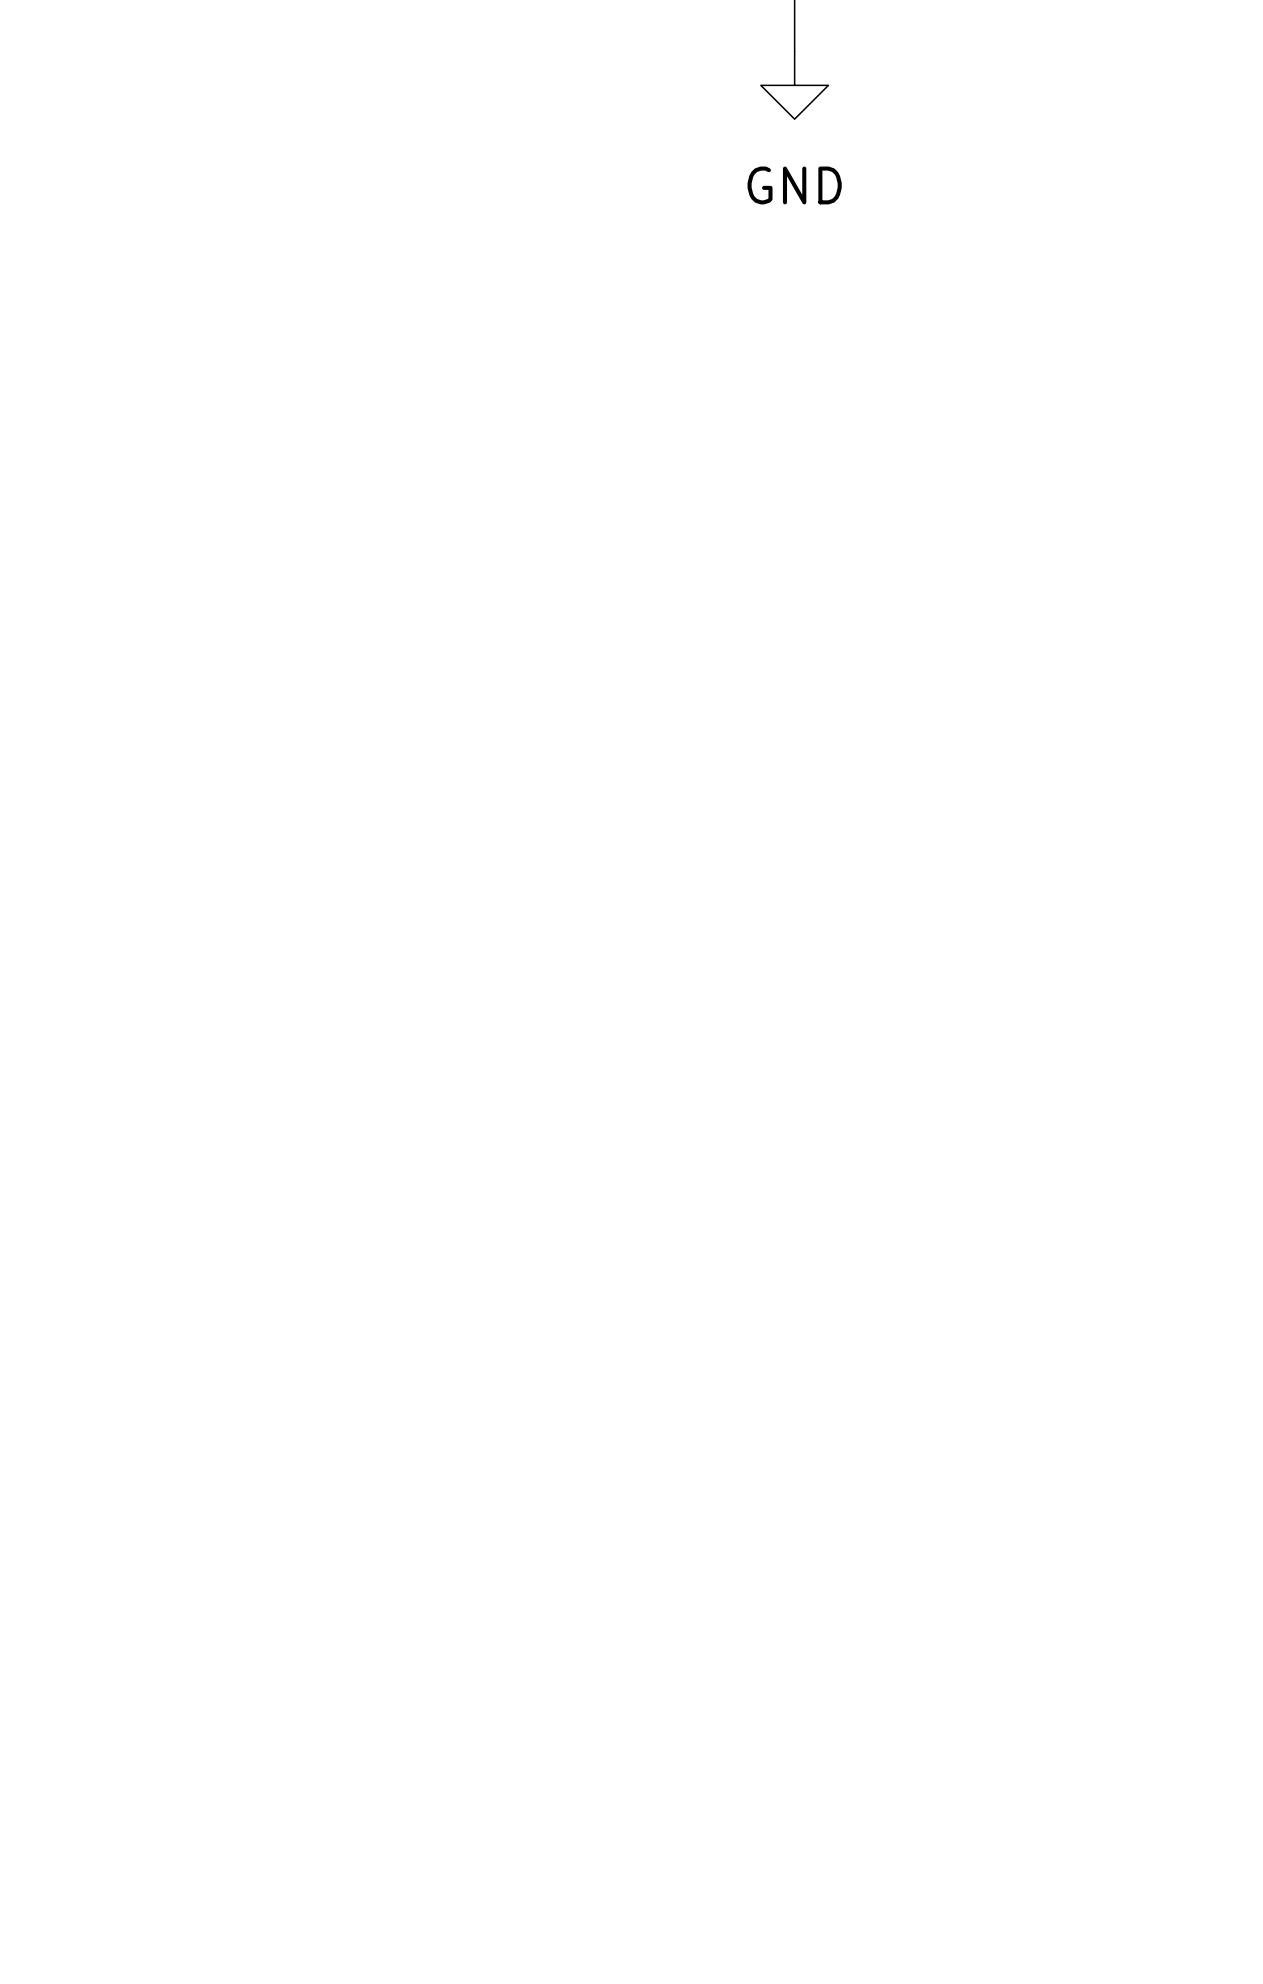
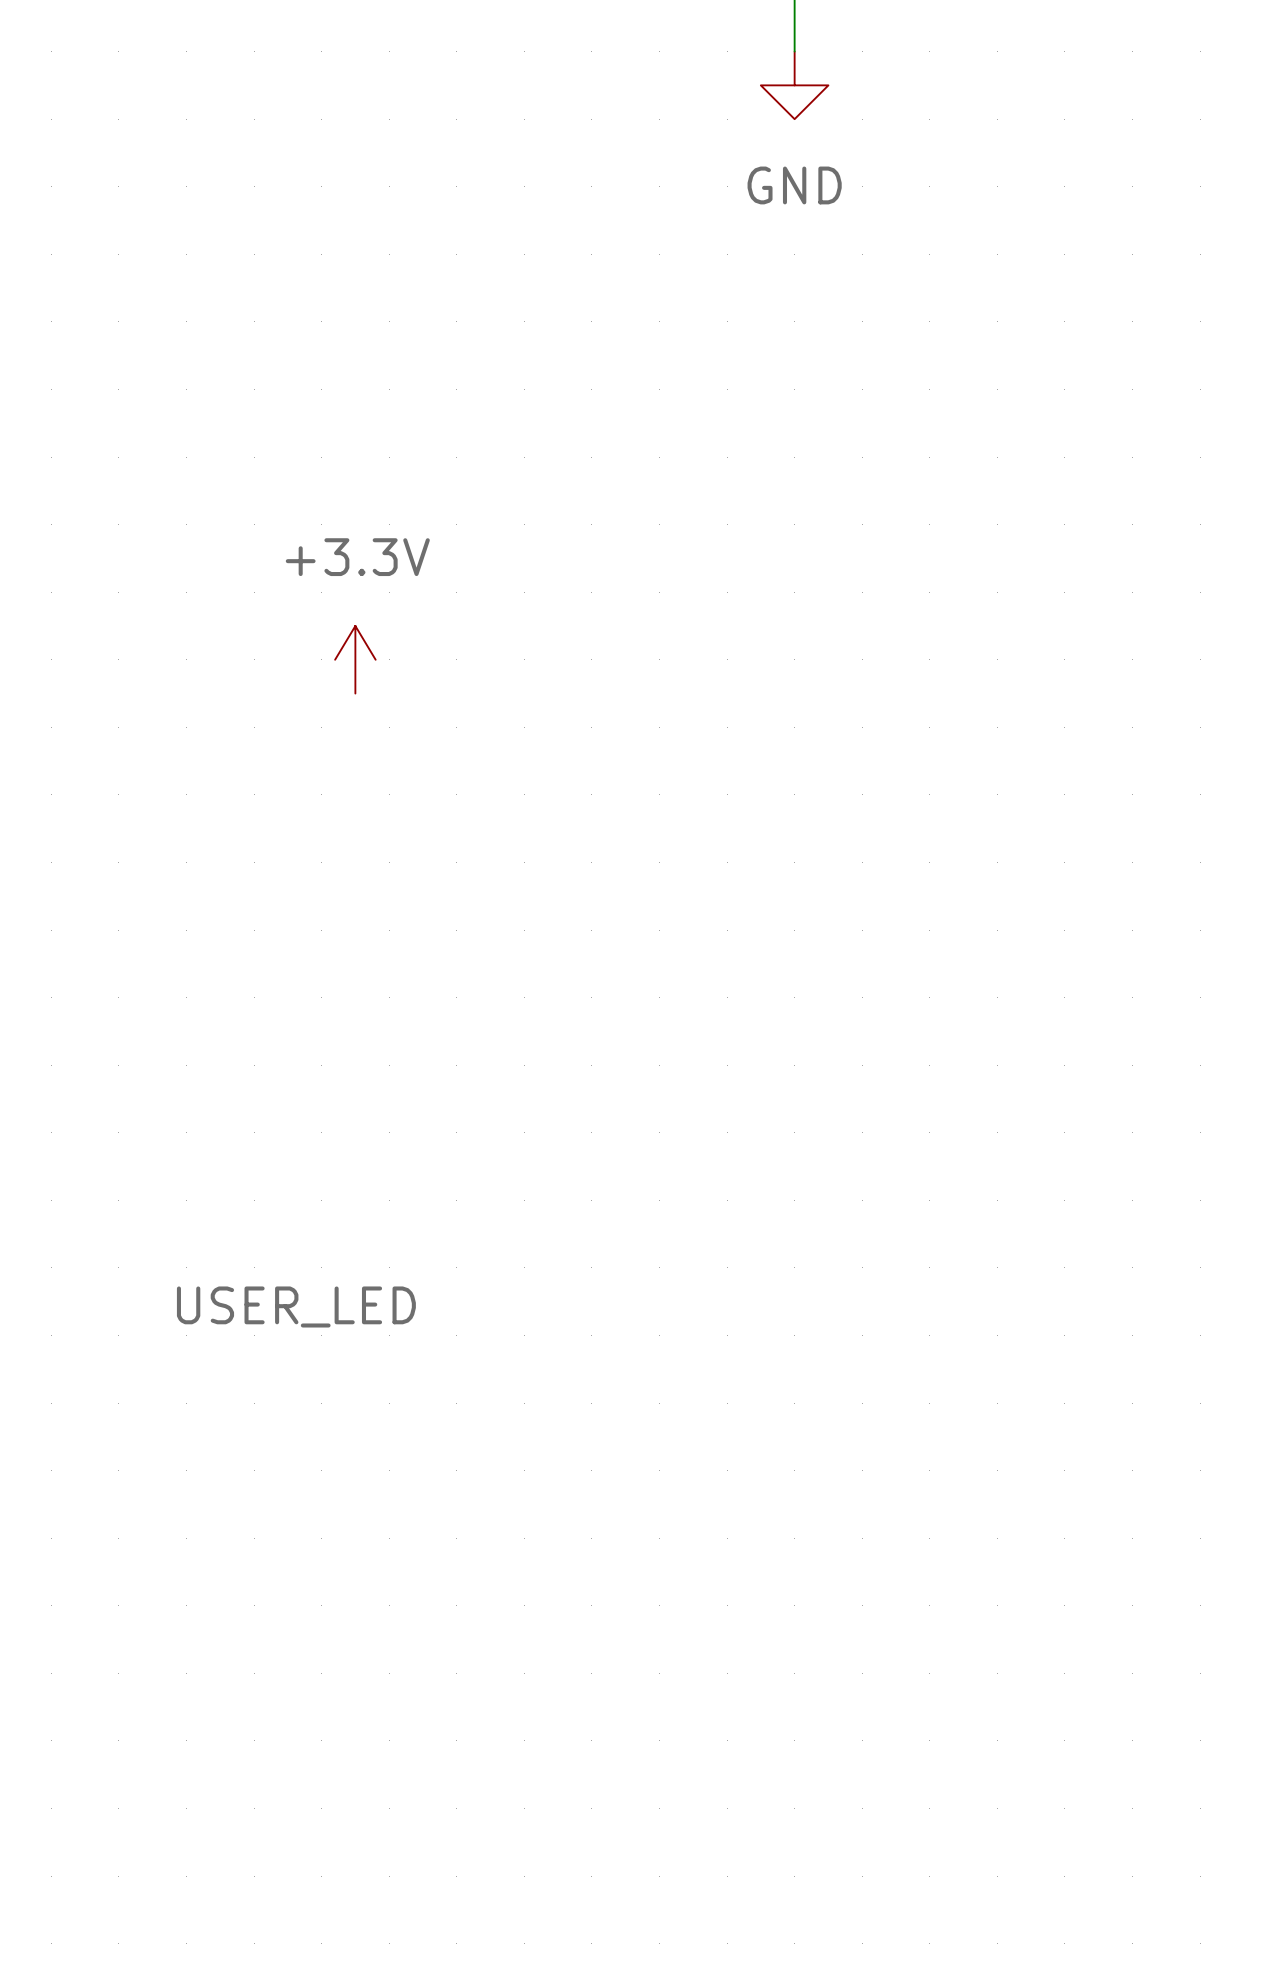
power symbol: none -> +3.3V (355, 659)
label: none -> USER_LED (296, 1306)

